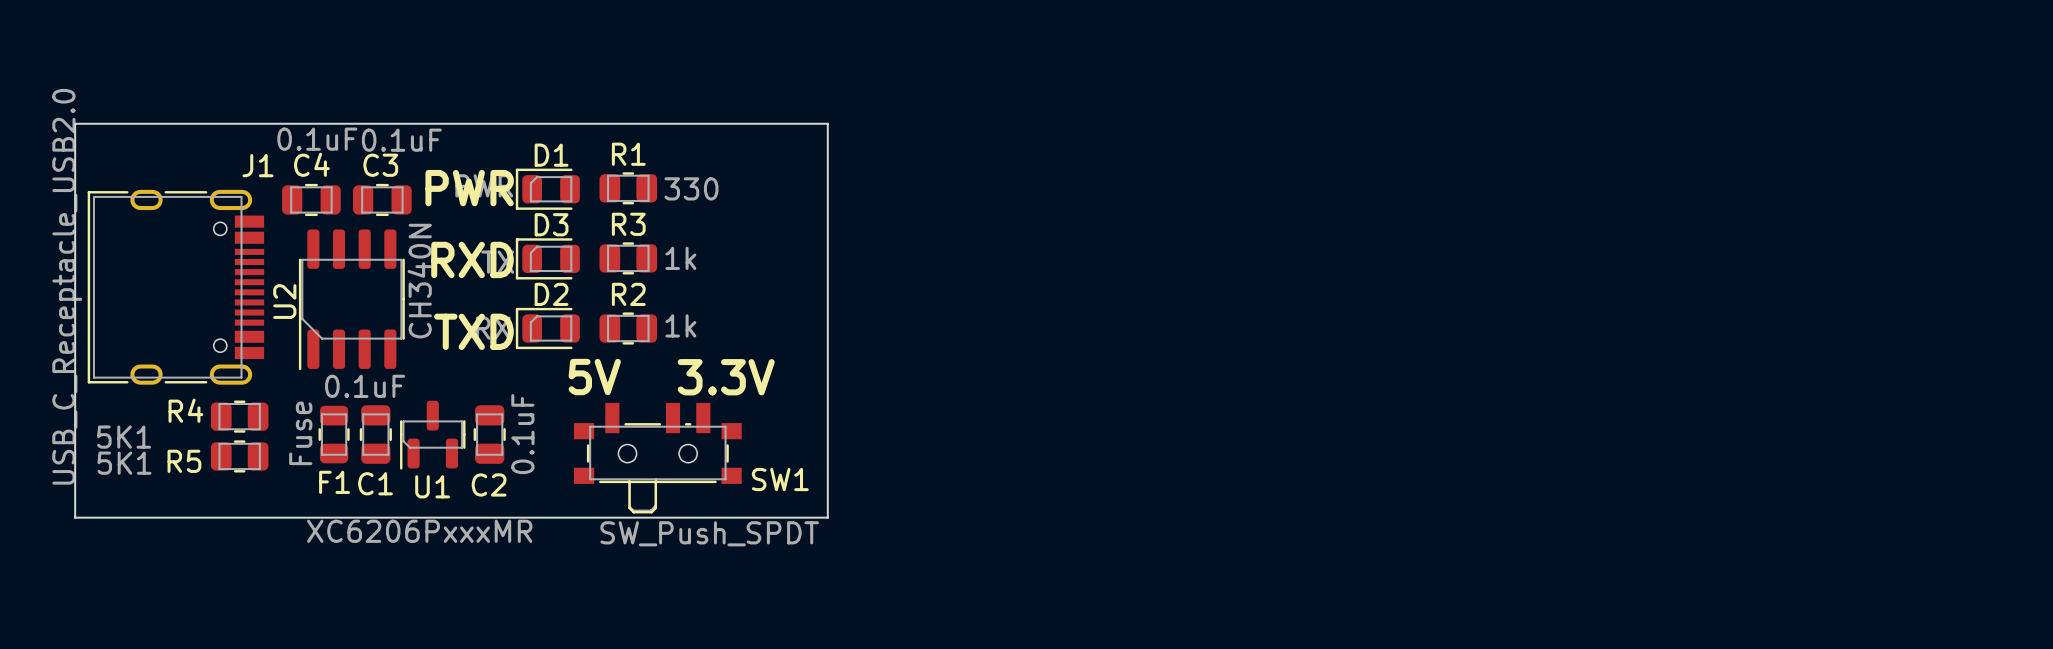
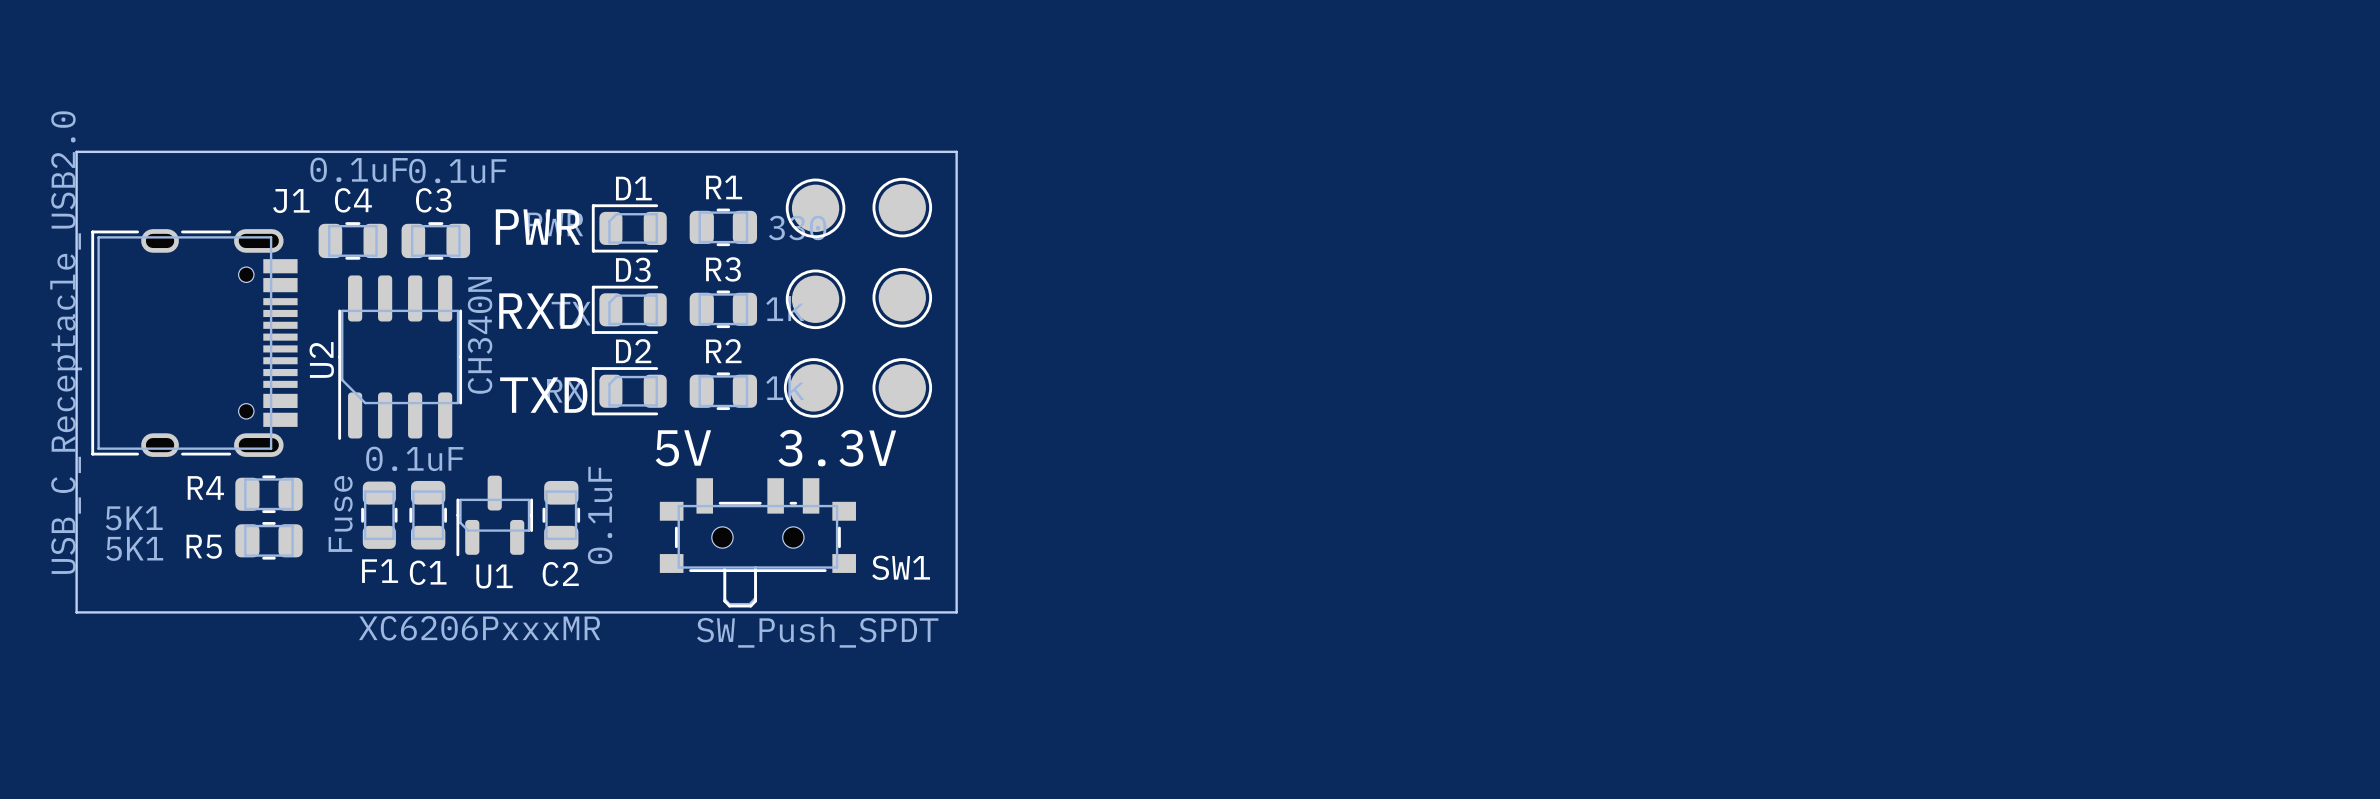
part: none -> (902, 207)
part: none -> (815, 208)
part: none -> (902, 297)
part: none -> (815, 299)
part: none -> (813, 387)
part: none -> (902, 387)

